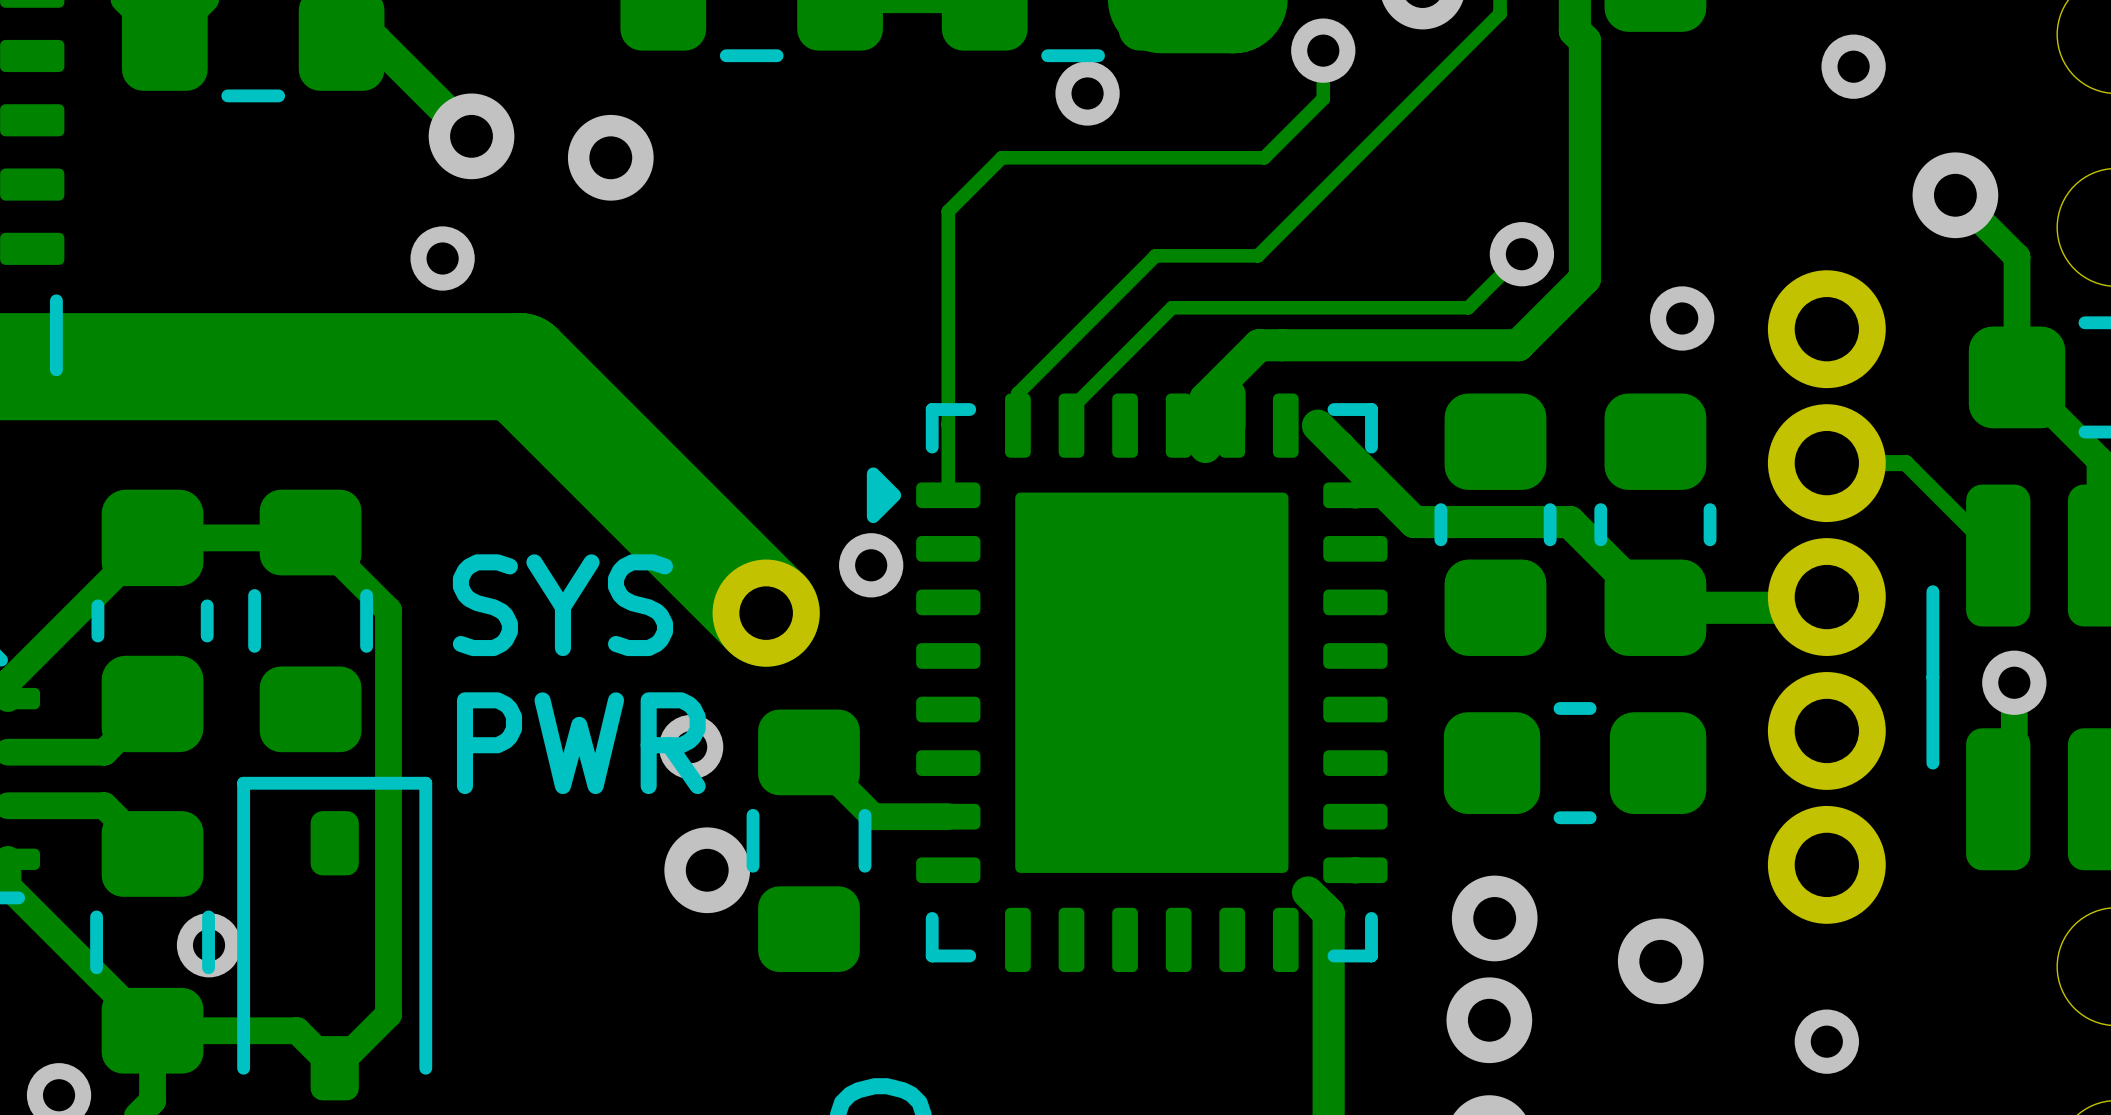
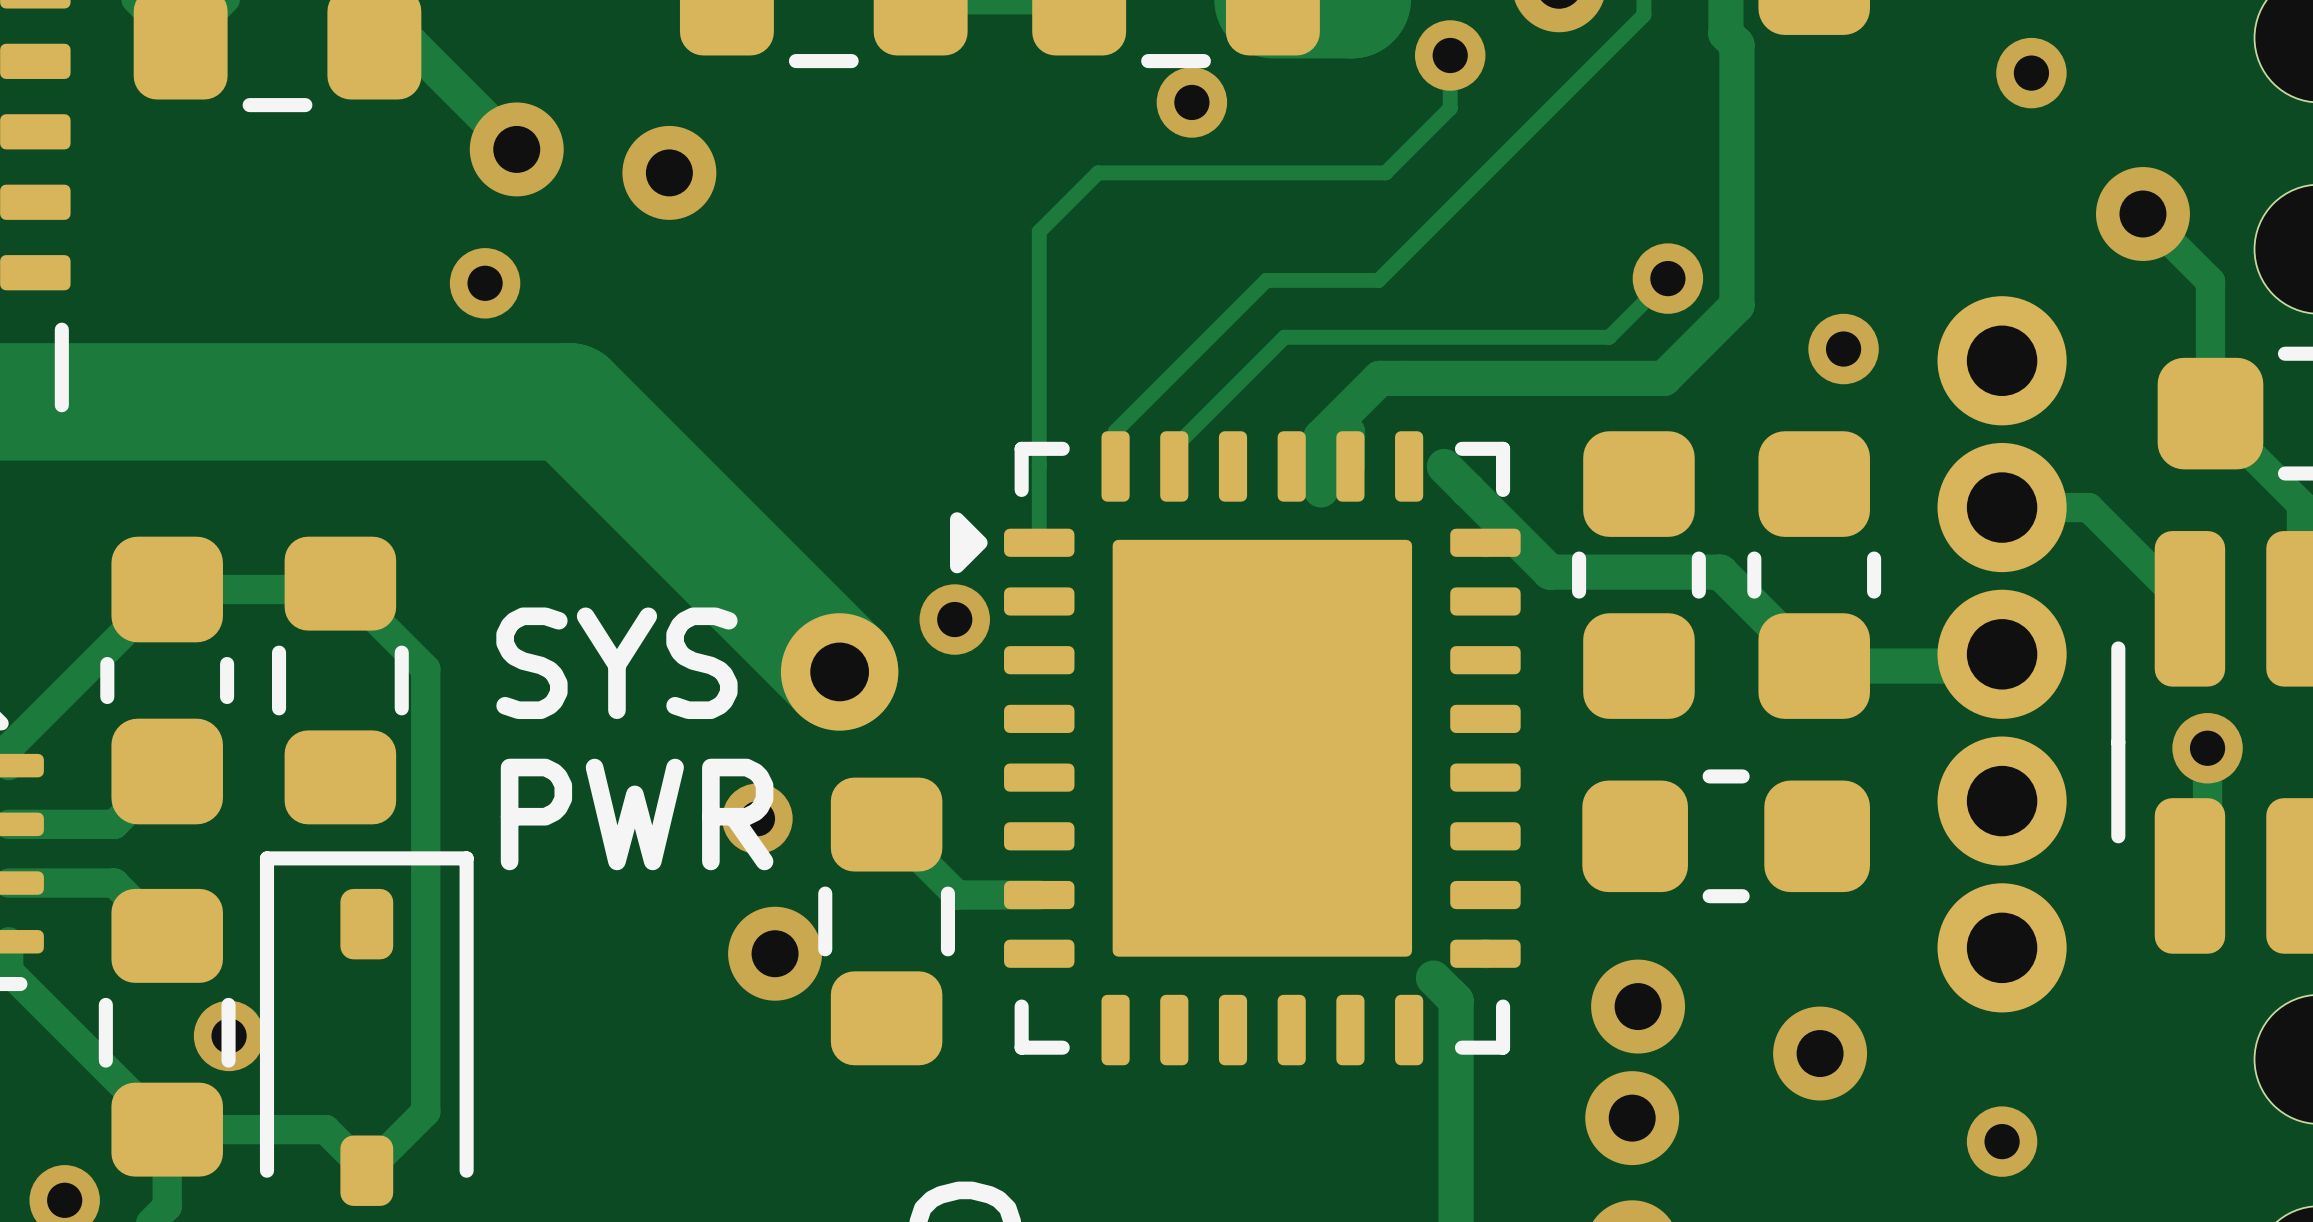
track width: thin (1826, 463) (1905, 463) (1998, 555) -> thick (2002, 507) (2088, 507) (2189, 608)

